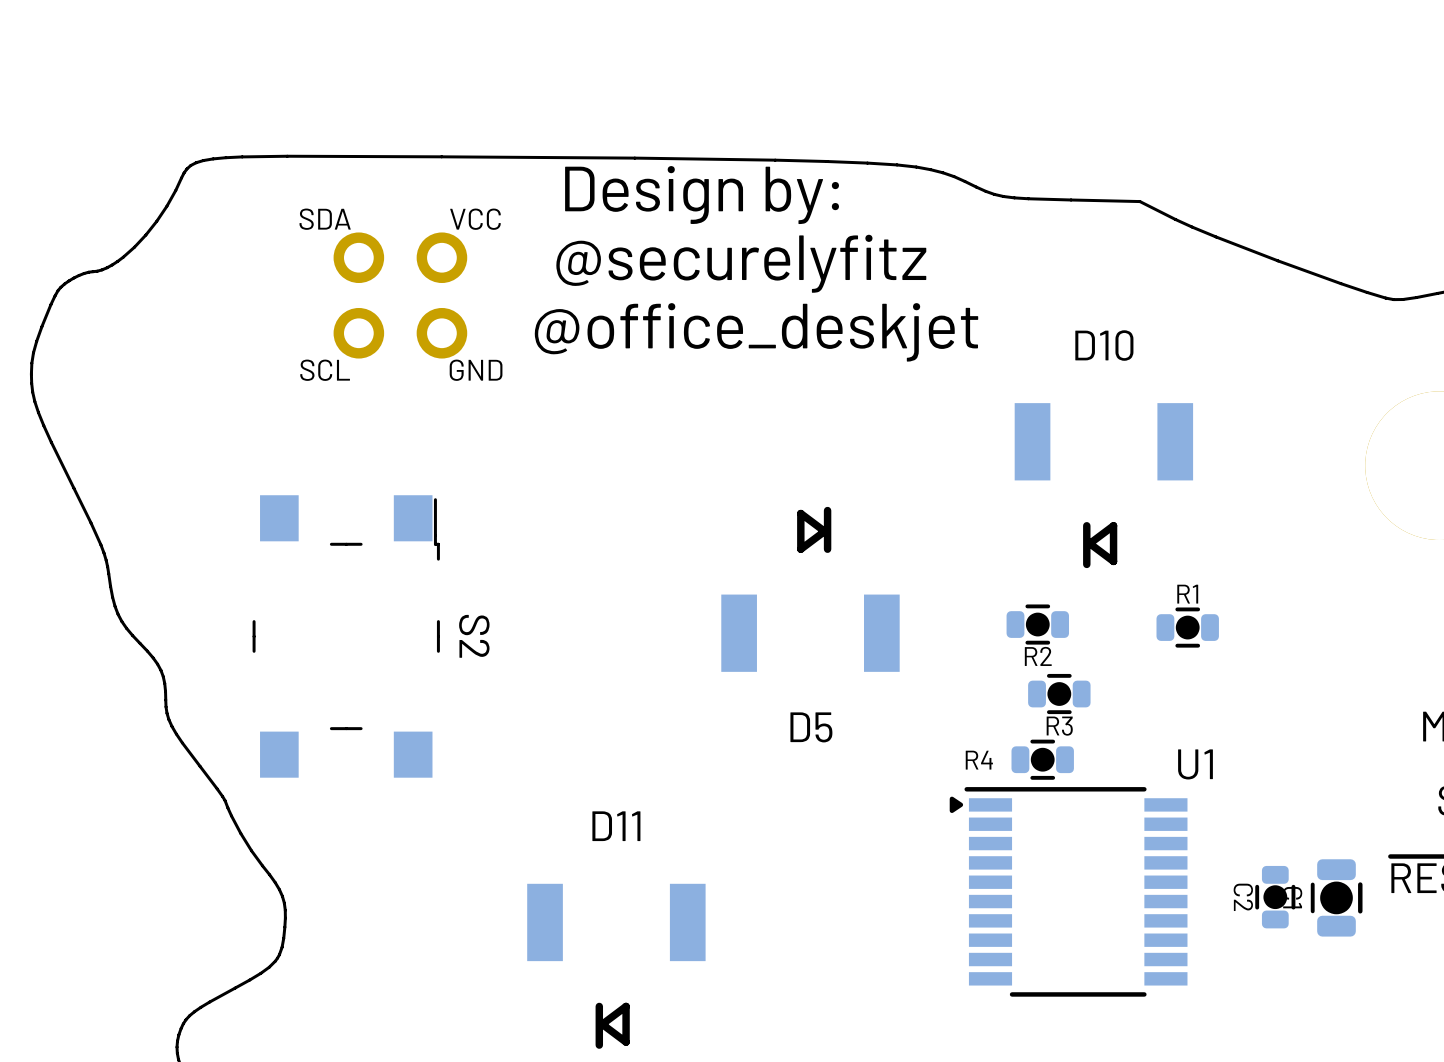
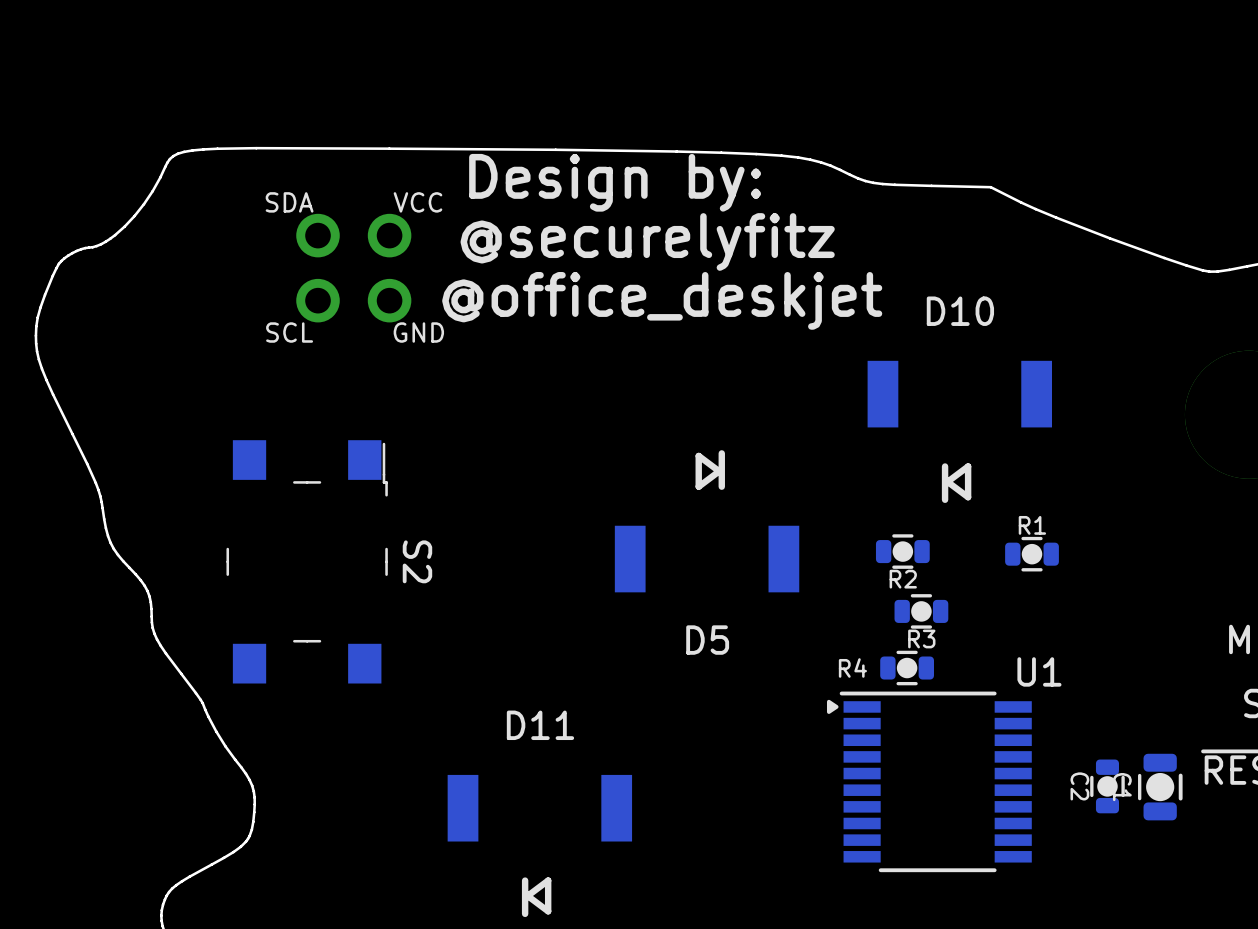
D10 footprint: [1014, 403, 1194, 569] -> [867, 360, 1053, 503]
D5 footprint: [721, 506, 900, 672] -> [614, 450, 800, 593]
D11 footprint: [527, 883, 706, 1049] -> [447, 774, 633, 918]

